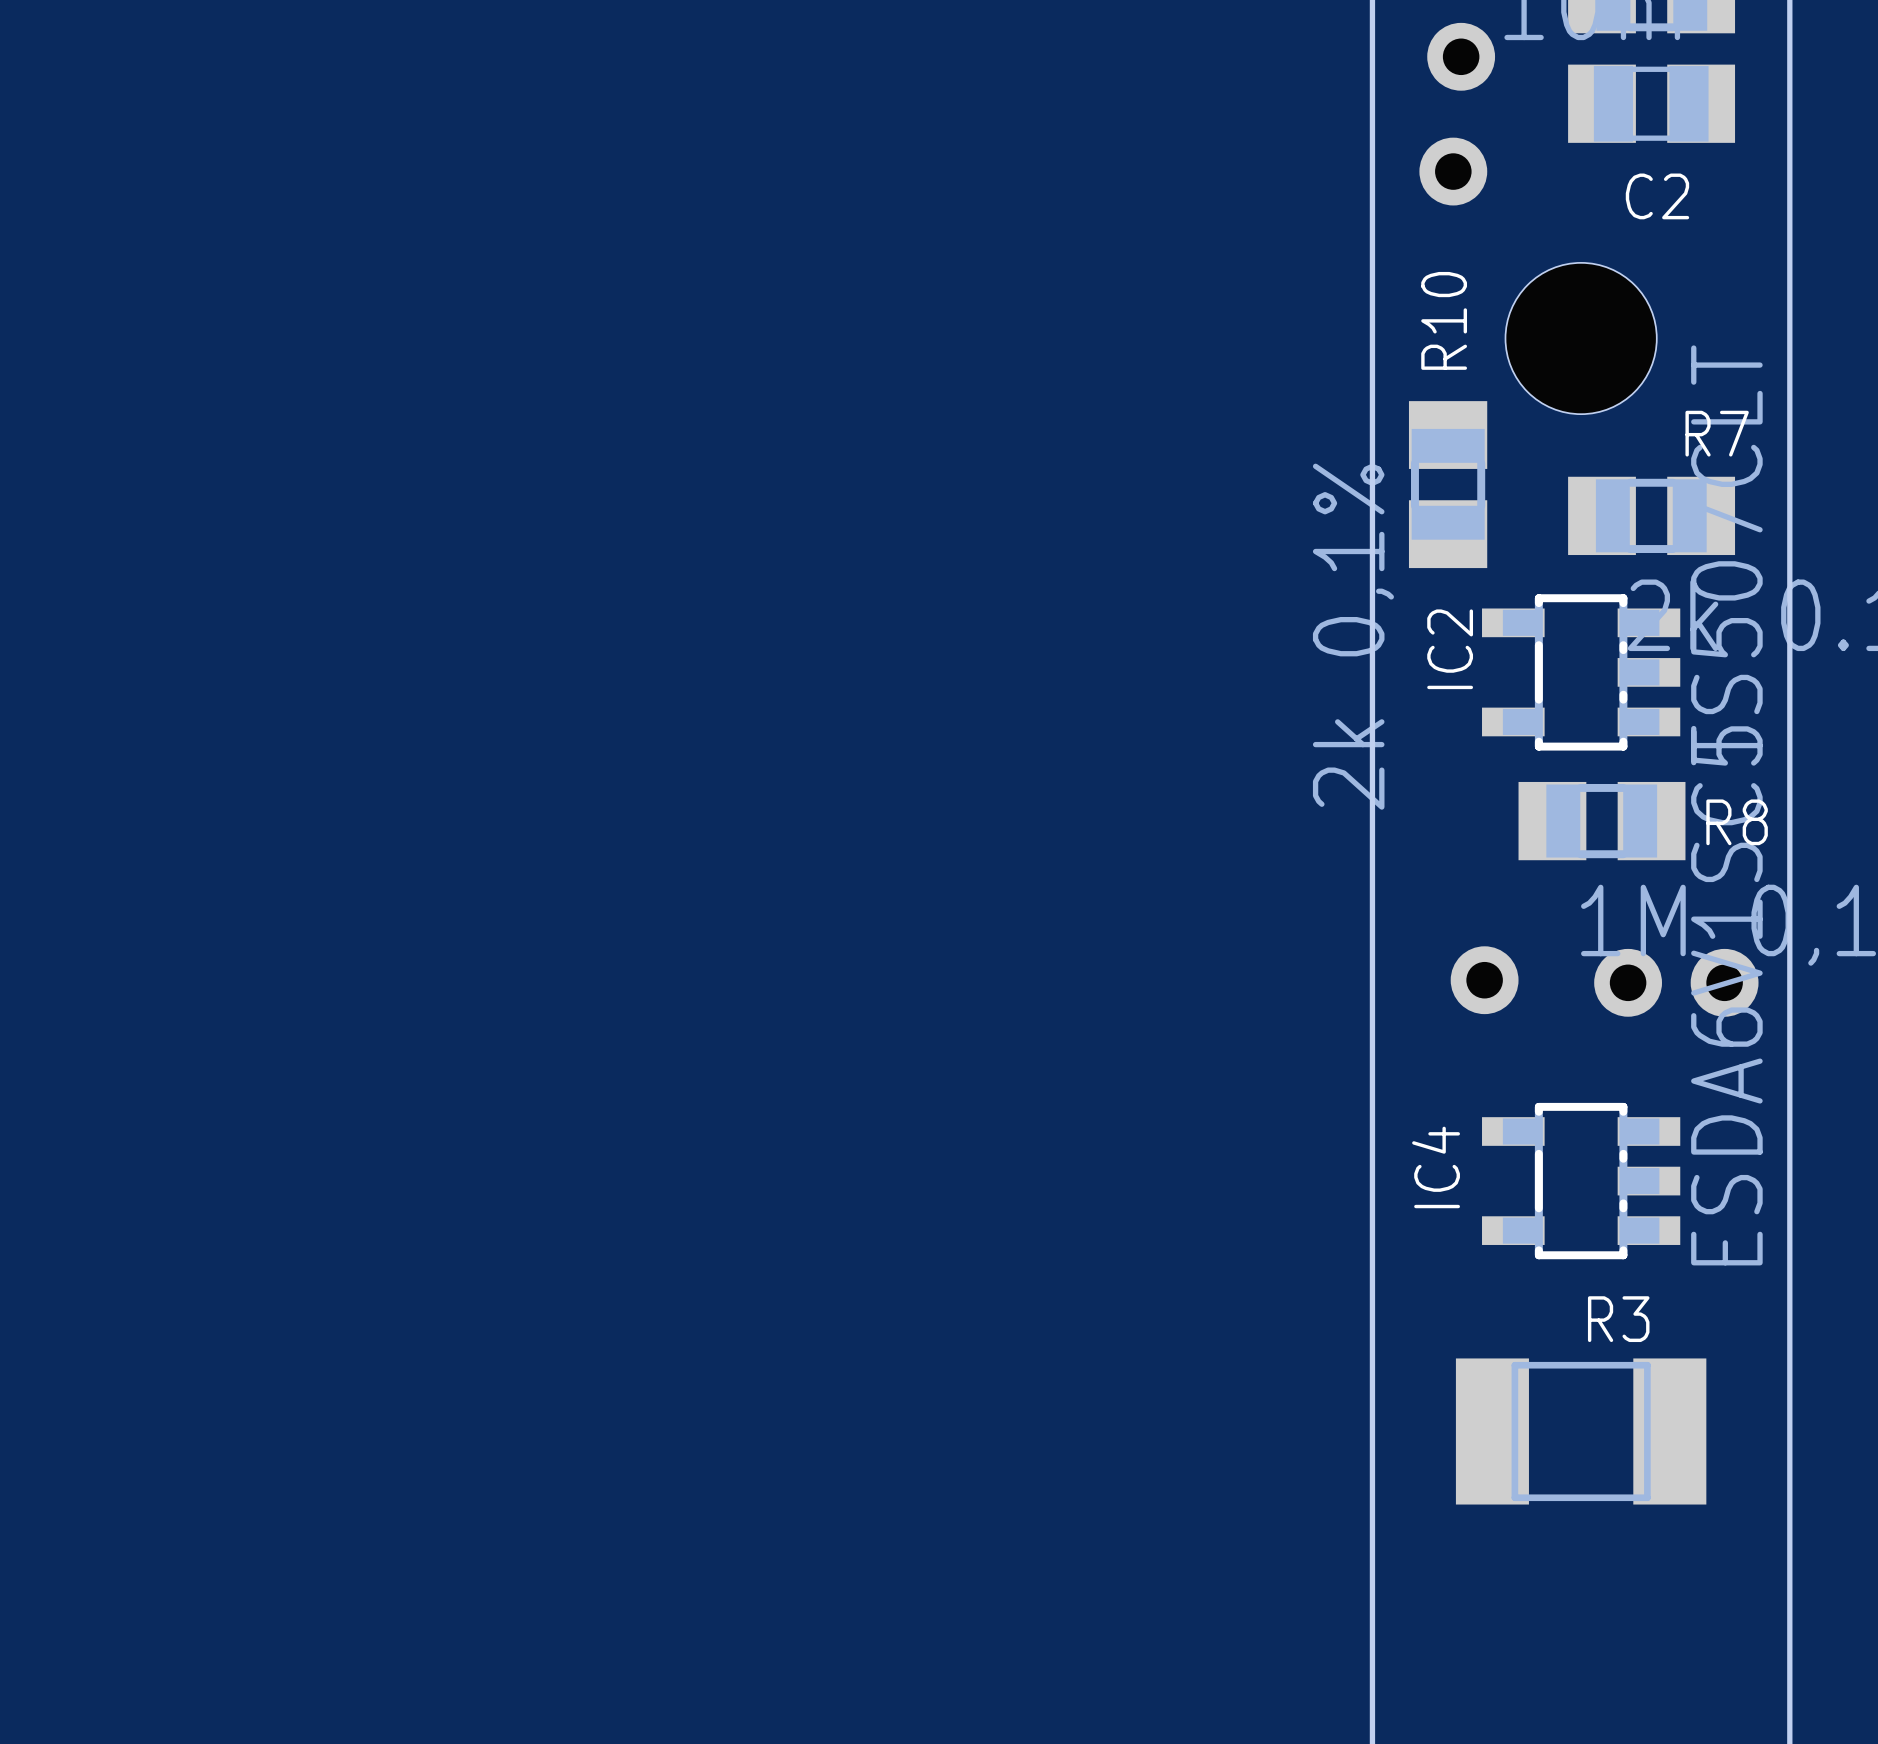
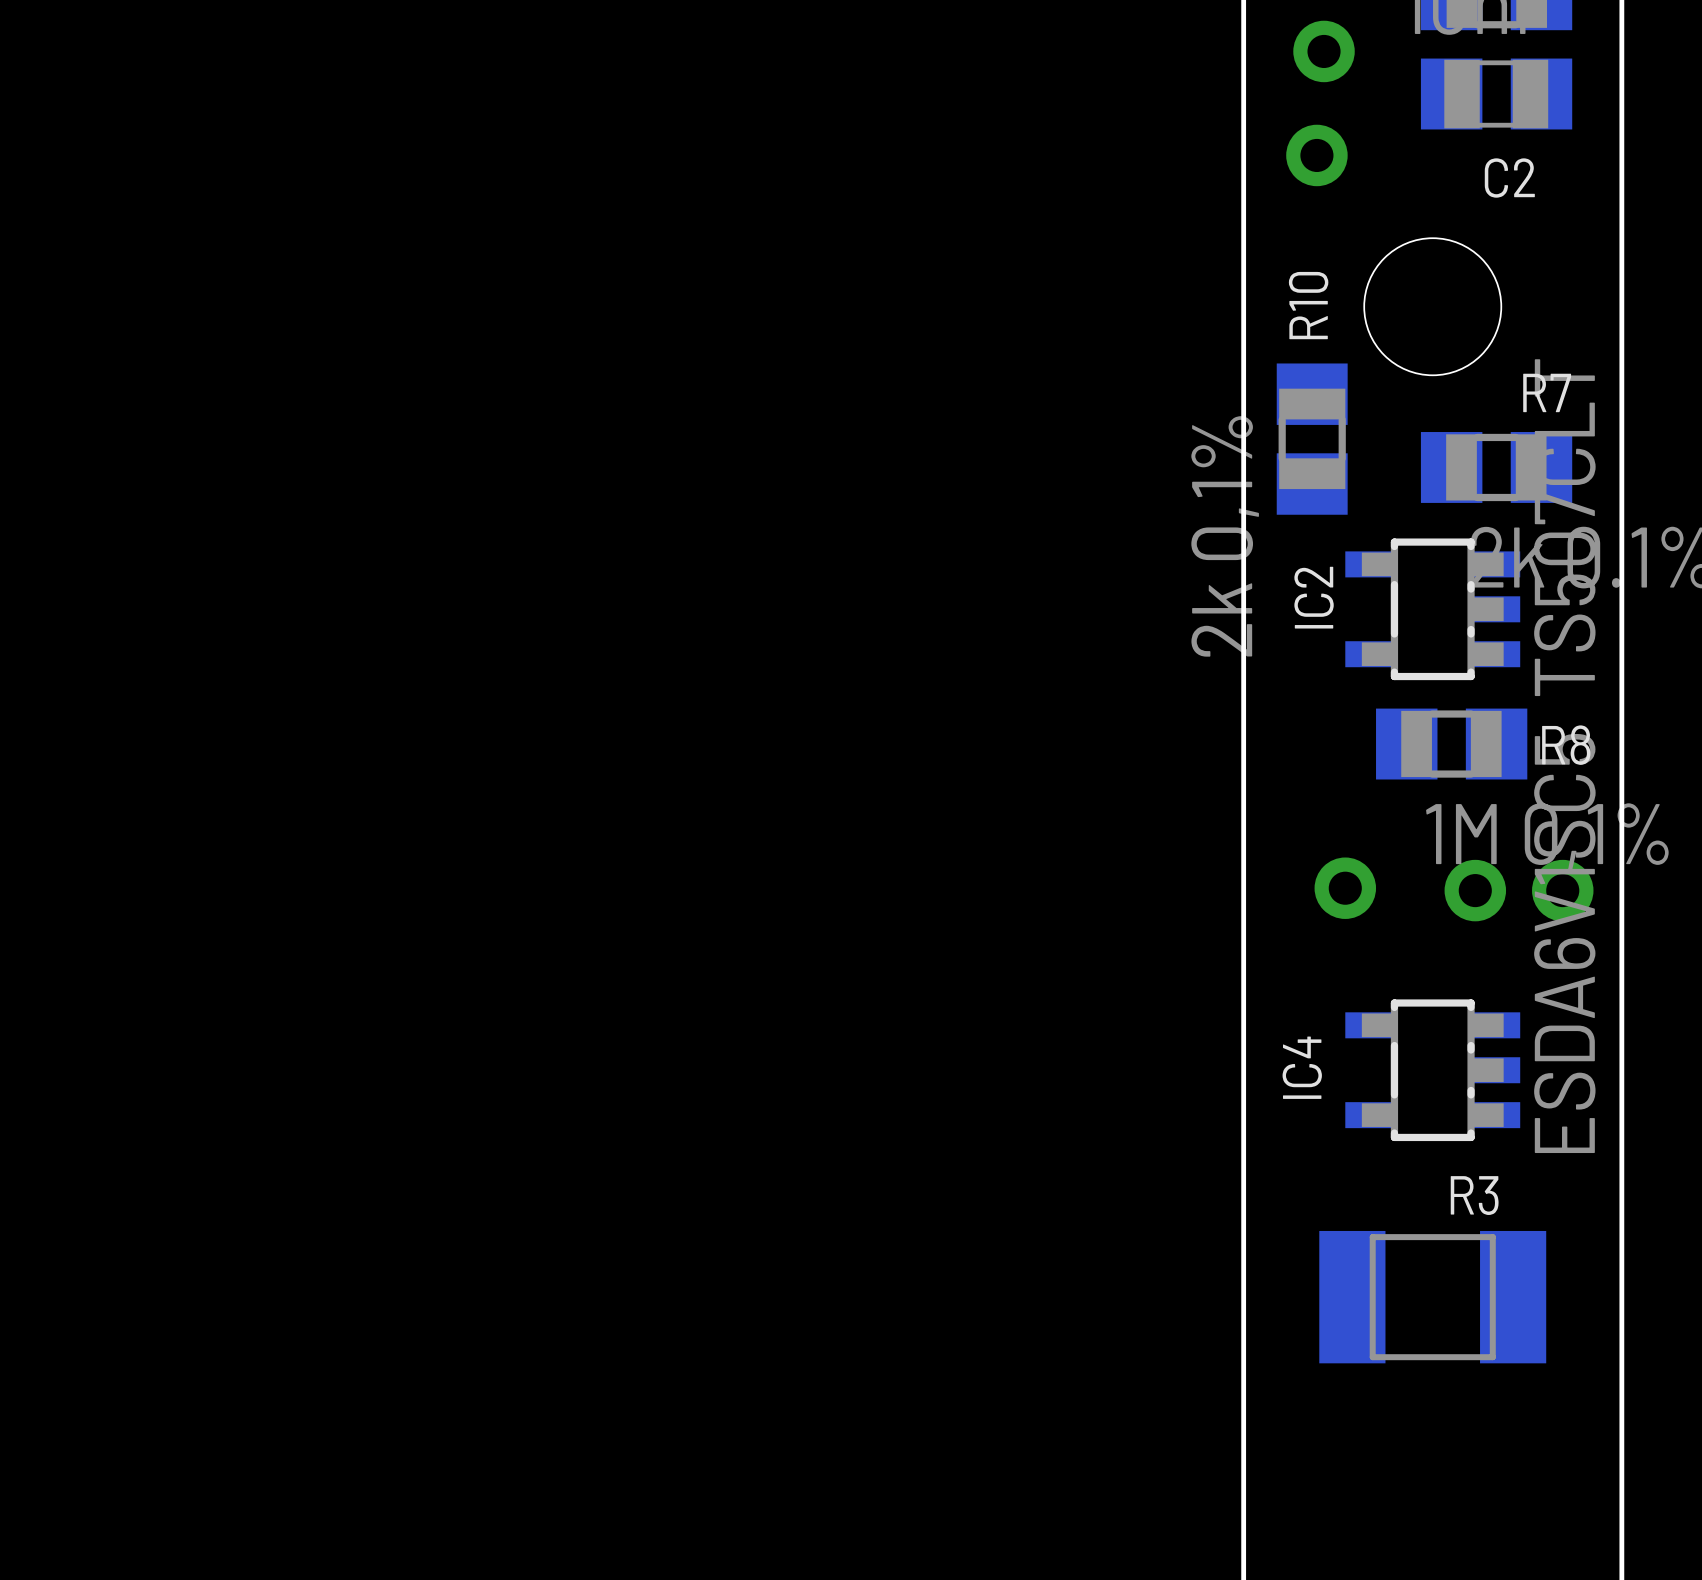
IC2 footprint: [1482, 594, 1681, 751] -> [1345, 538, 1521, 681]
IC4 footprint: [1482, 1102, 1681, 1260] -> [1345, 999, 1521, 1142]

